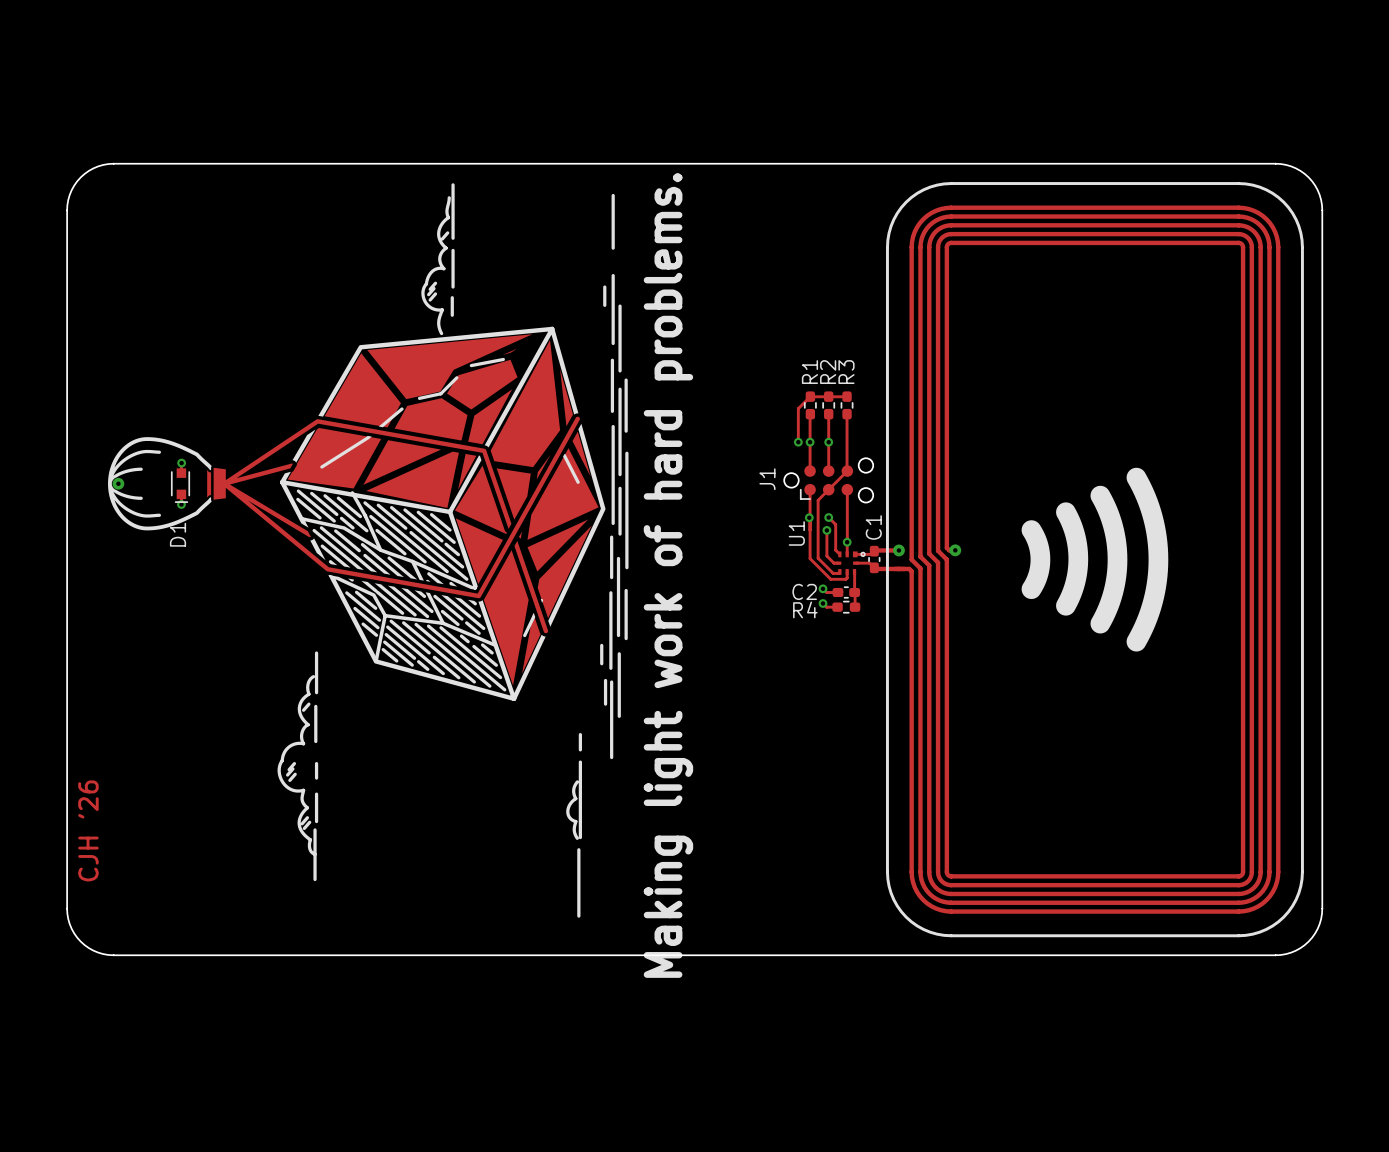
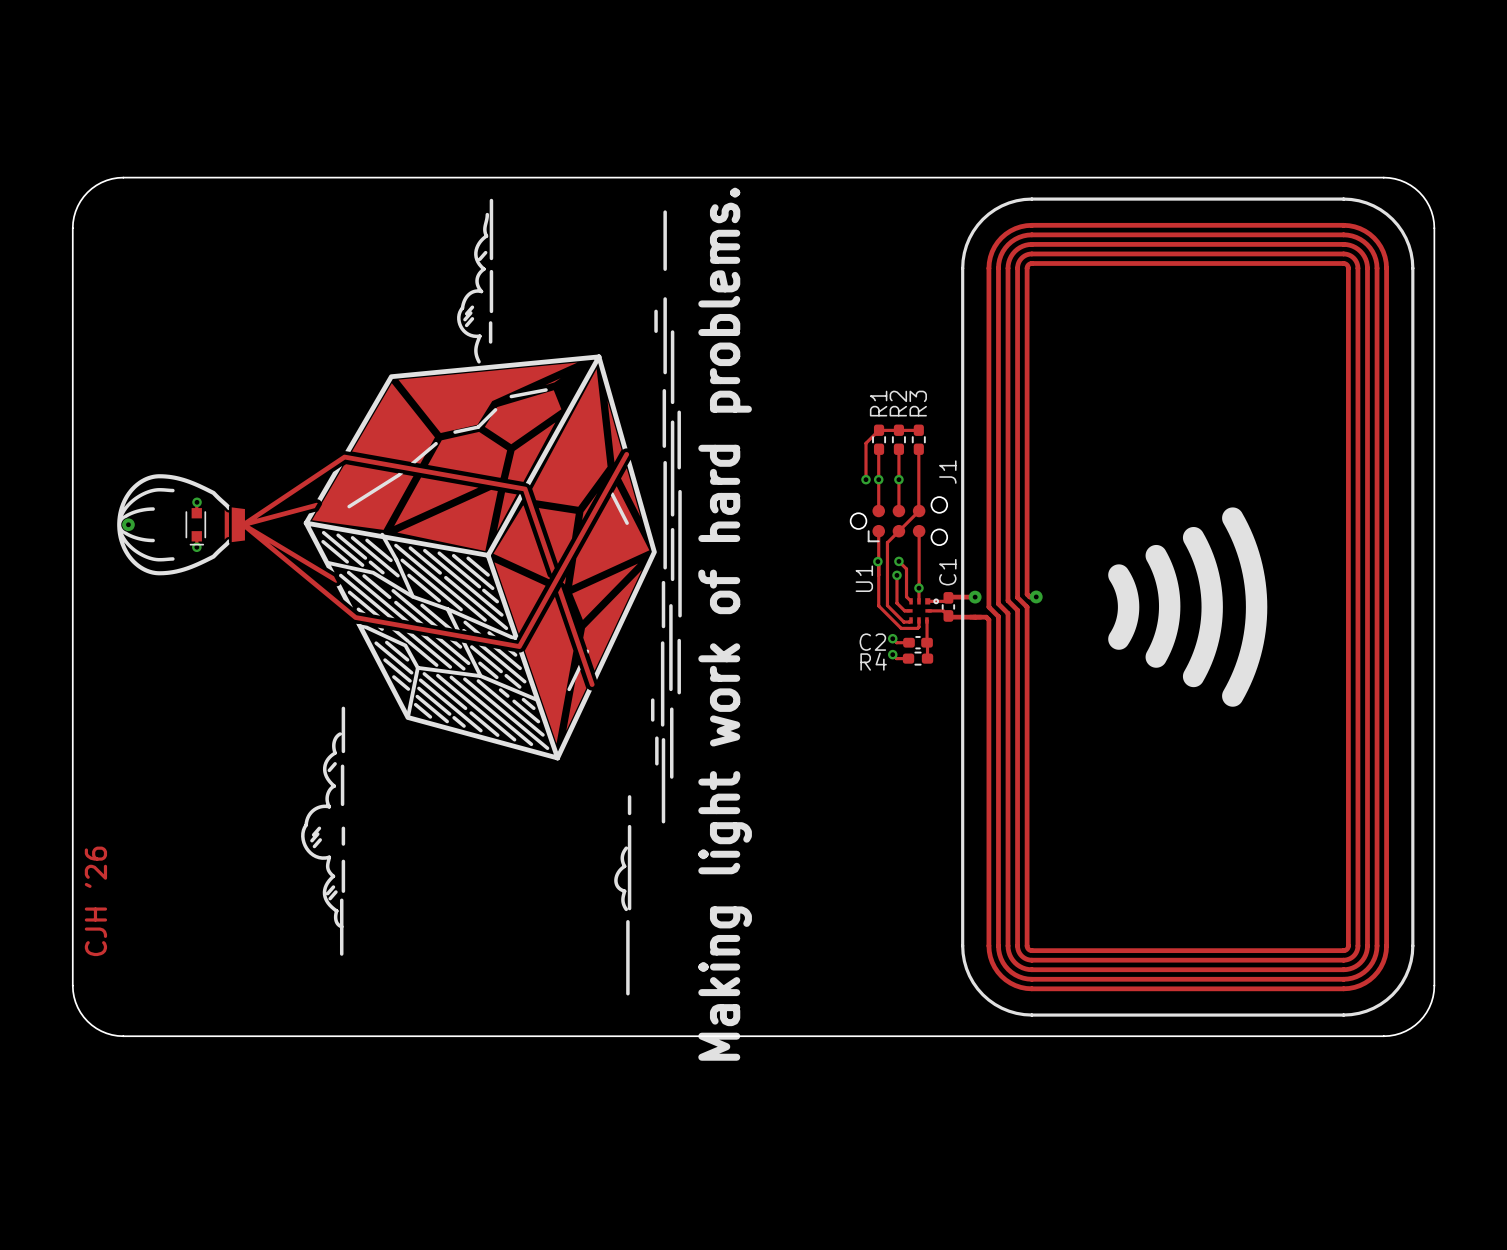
J1 name position: J1 (767, 479) -> J1 (947, 472)
D1 name: D1 (178, 534) -> none

